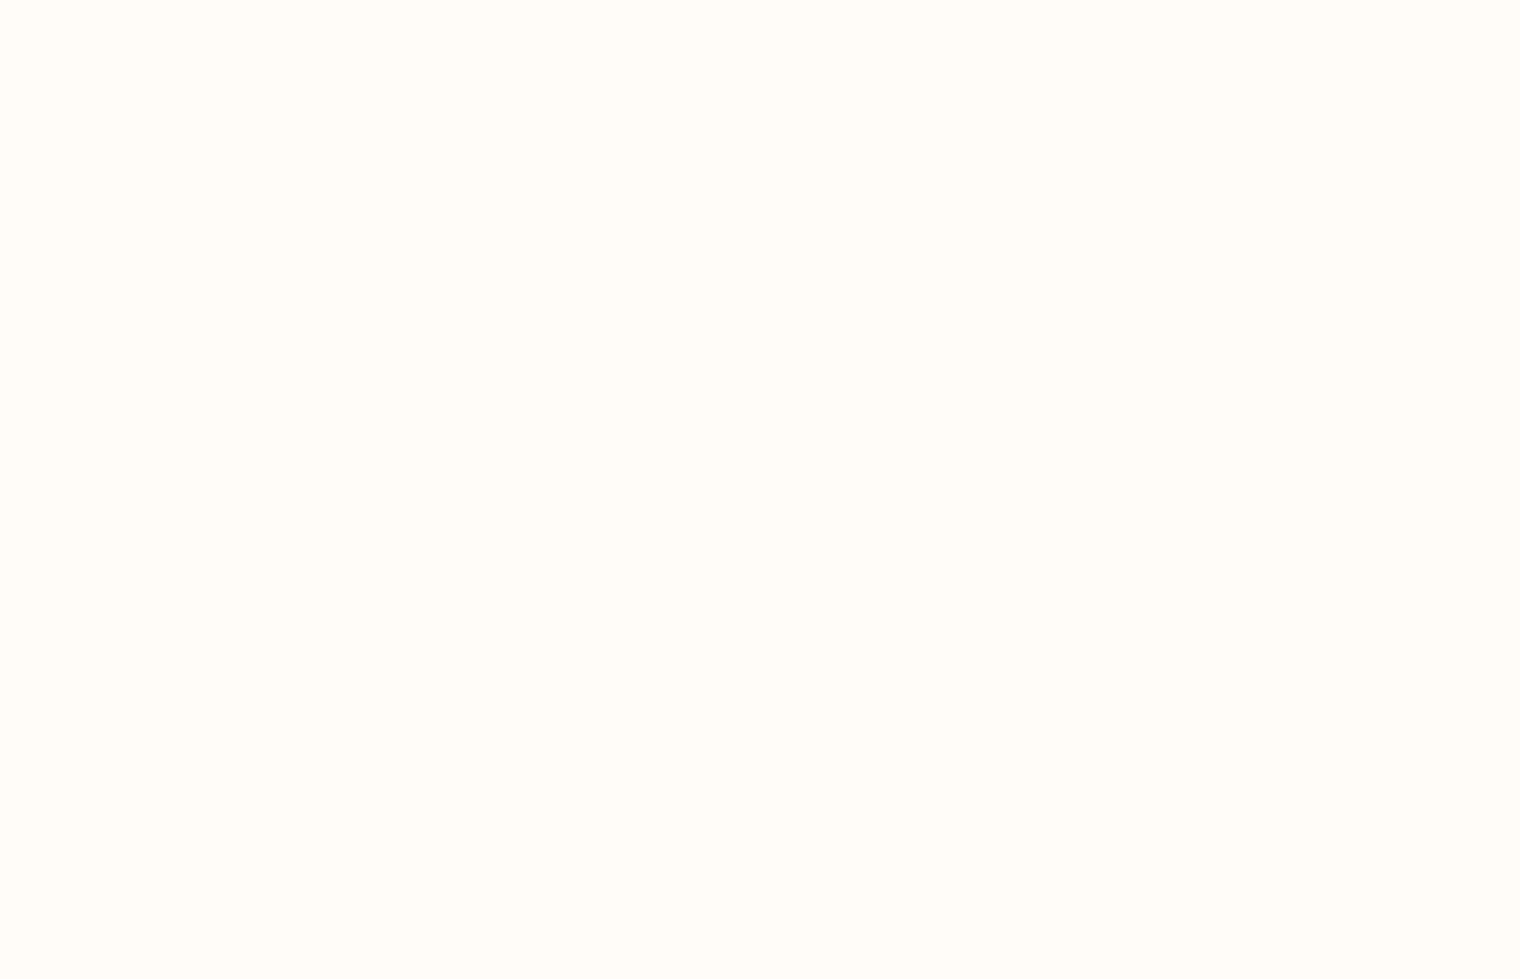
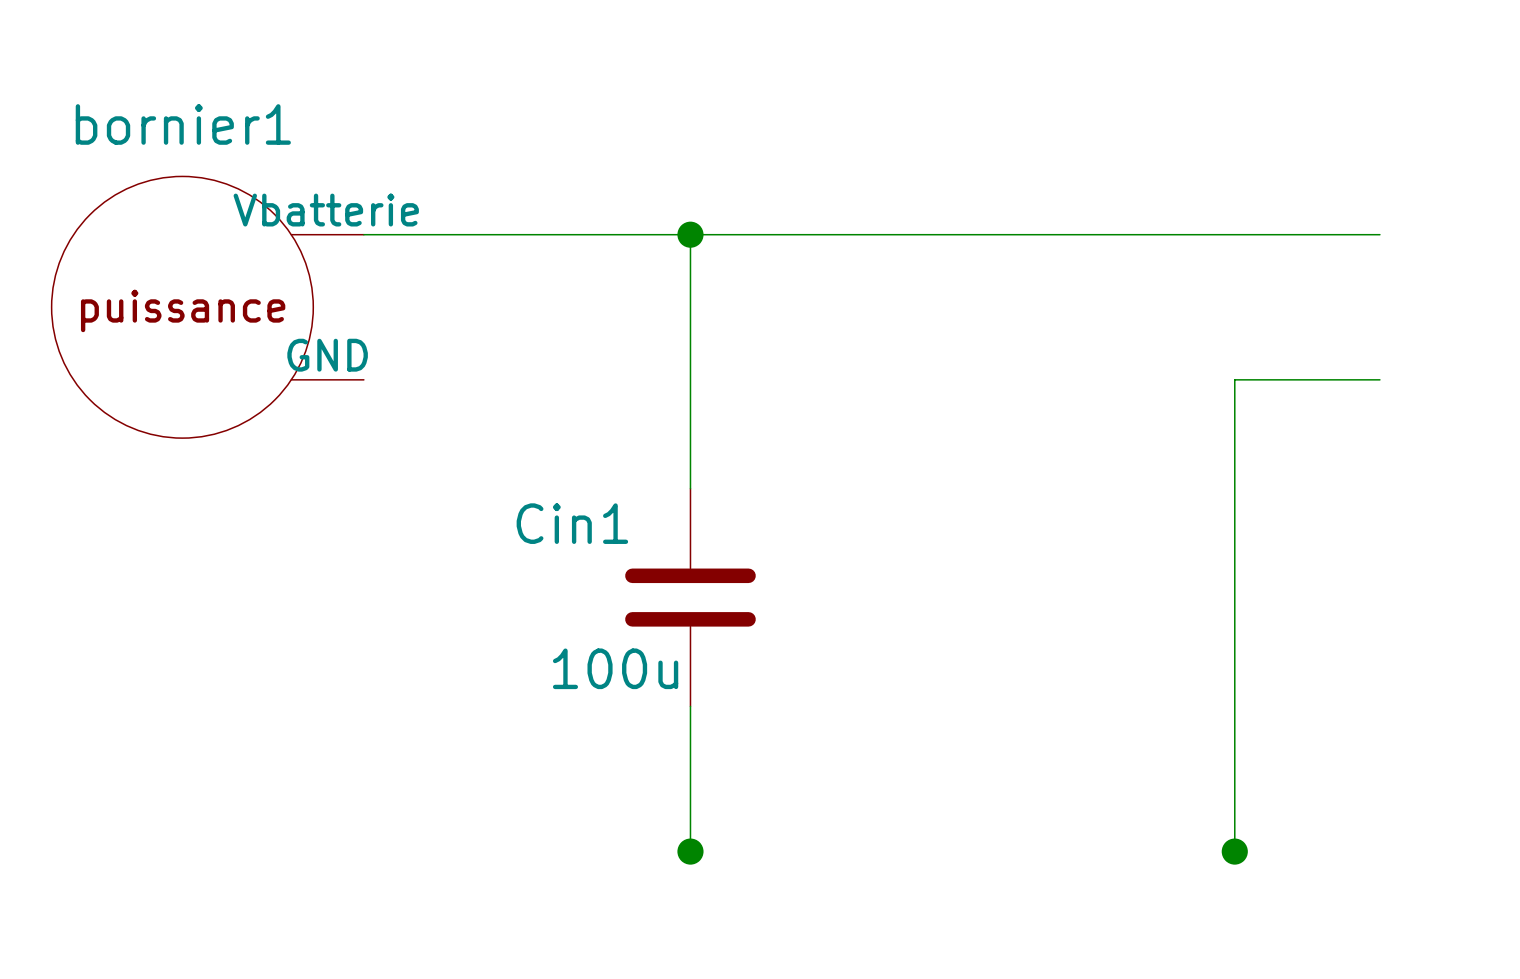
wire: none -> (363, 234) (1379, 234)
wire: none -> (690, 234) (690, 488)
junction: none -> (690, 234)
bornier1: none -> (207, 307)
wire: none -> (1379, 379) (1234, 379) (1234, 851)
Cin1: none -> 100u (690, 597)
wire: none -> (690, 706) (690, 851)
junction: none -> (690, 851)
junction: none -> (1234, 851)

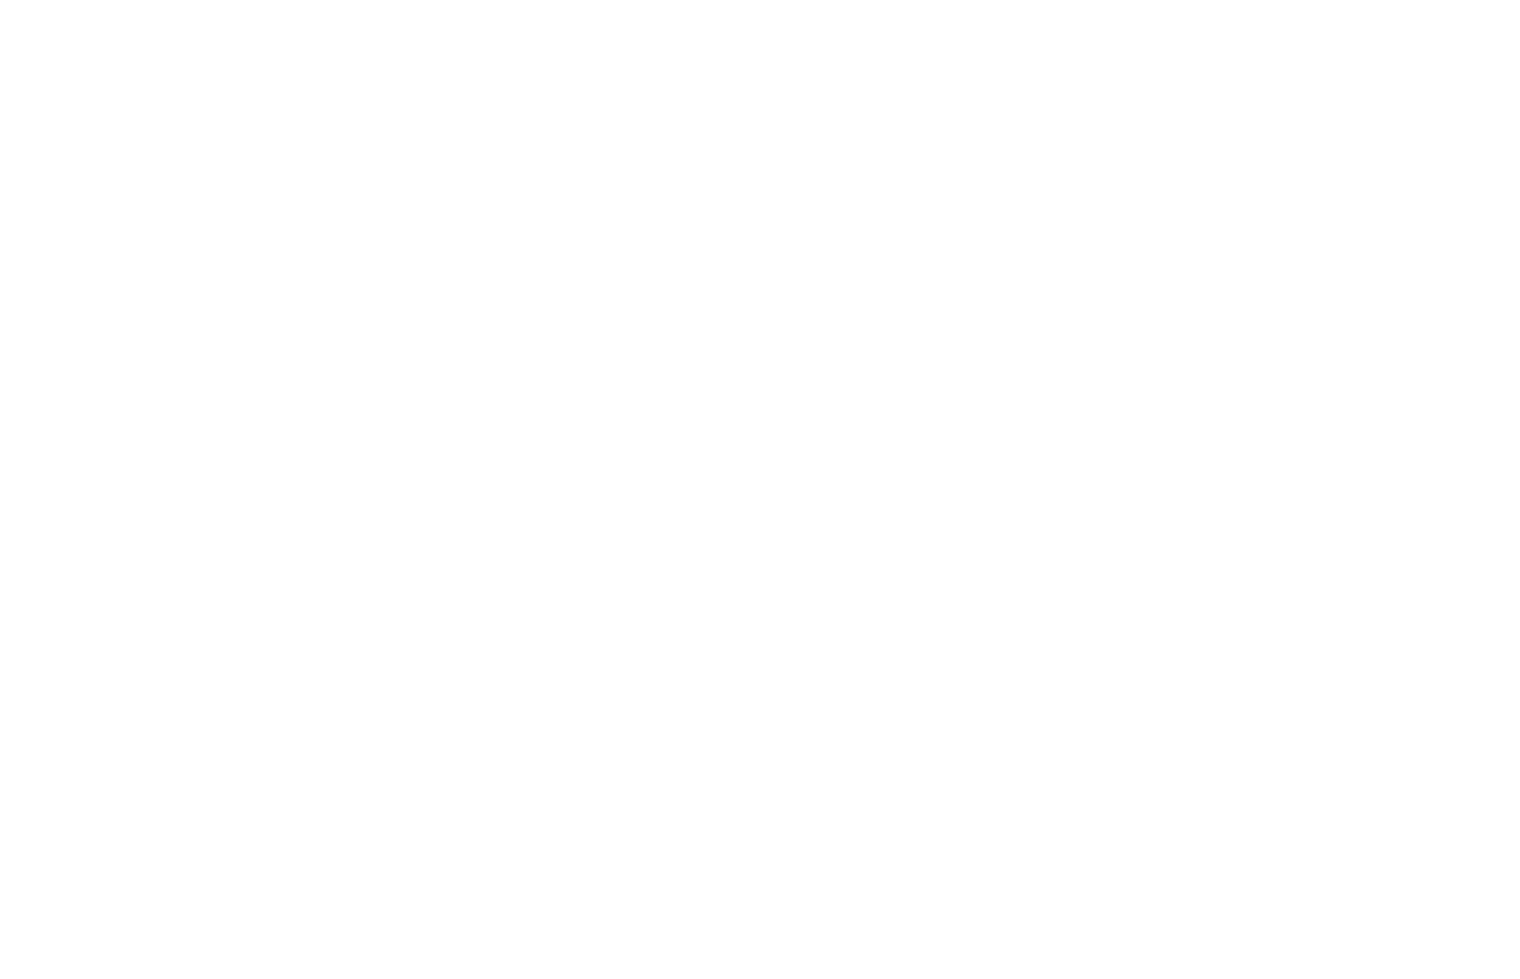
wire: (363, 234) (1379, 234) -> none
wire: (690, 234) (690, 488) -> none
junction: (690, 234) -> none
bornier1: (207, 307) -> none
wire: (1379, 379) (1234, 379) (1234, 851) -> none
Cin1: 100u (690, 597) -> none
wire: (690, 706) (690, 851) -> none
junction: (690, 851) -> none
junction: (1234, 851) -> none

